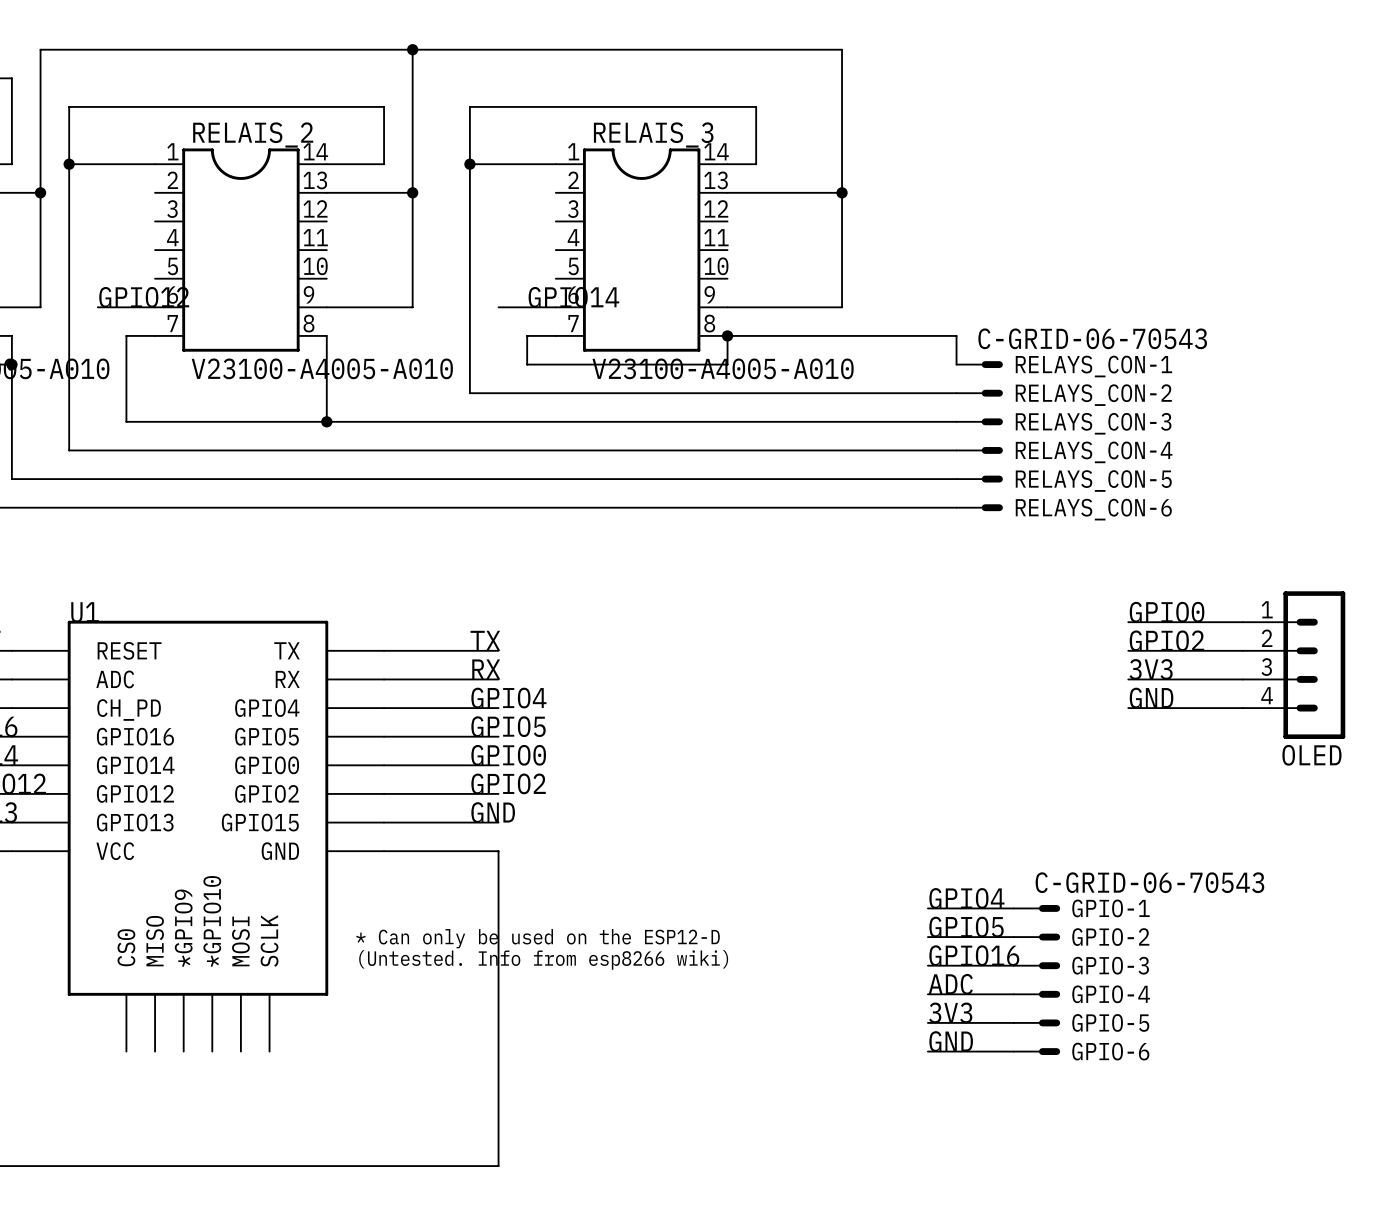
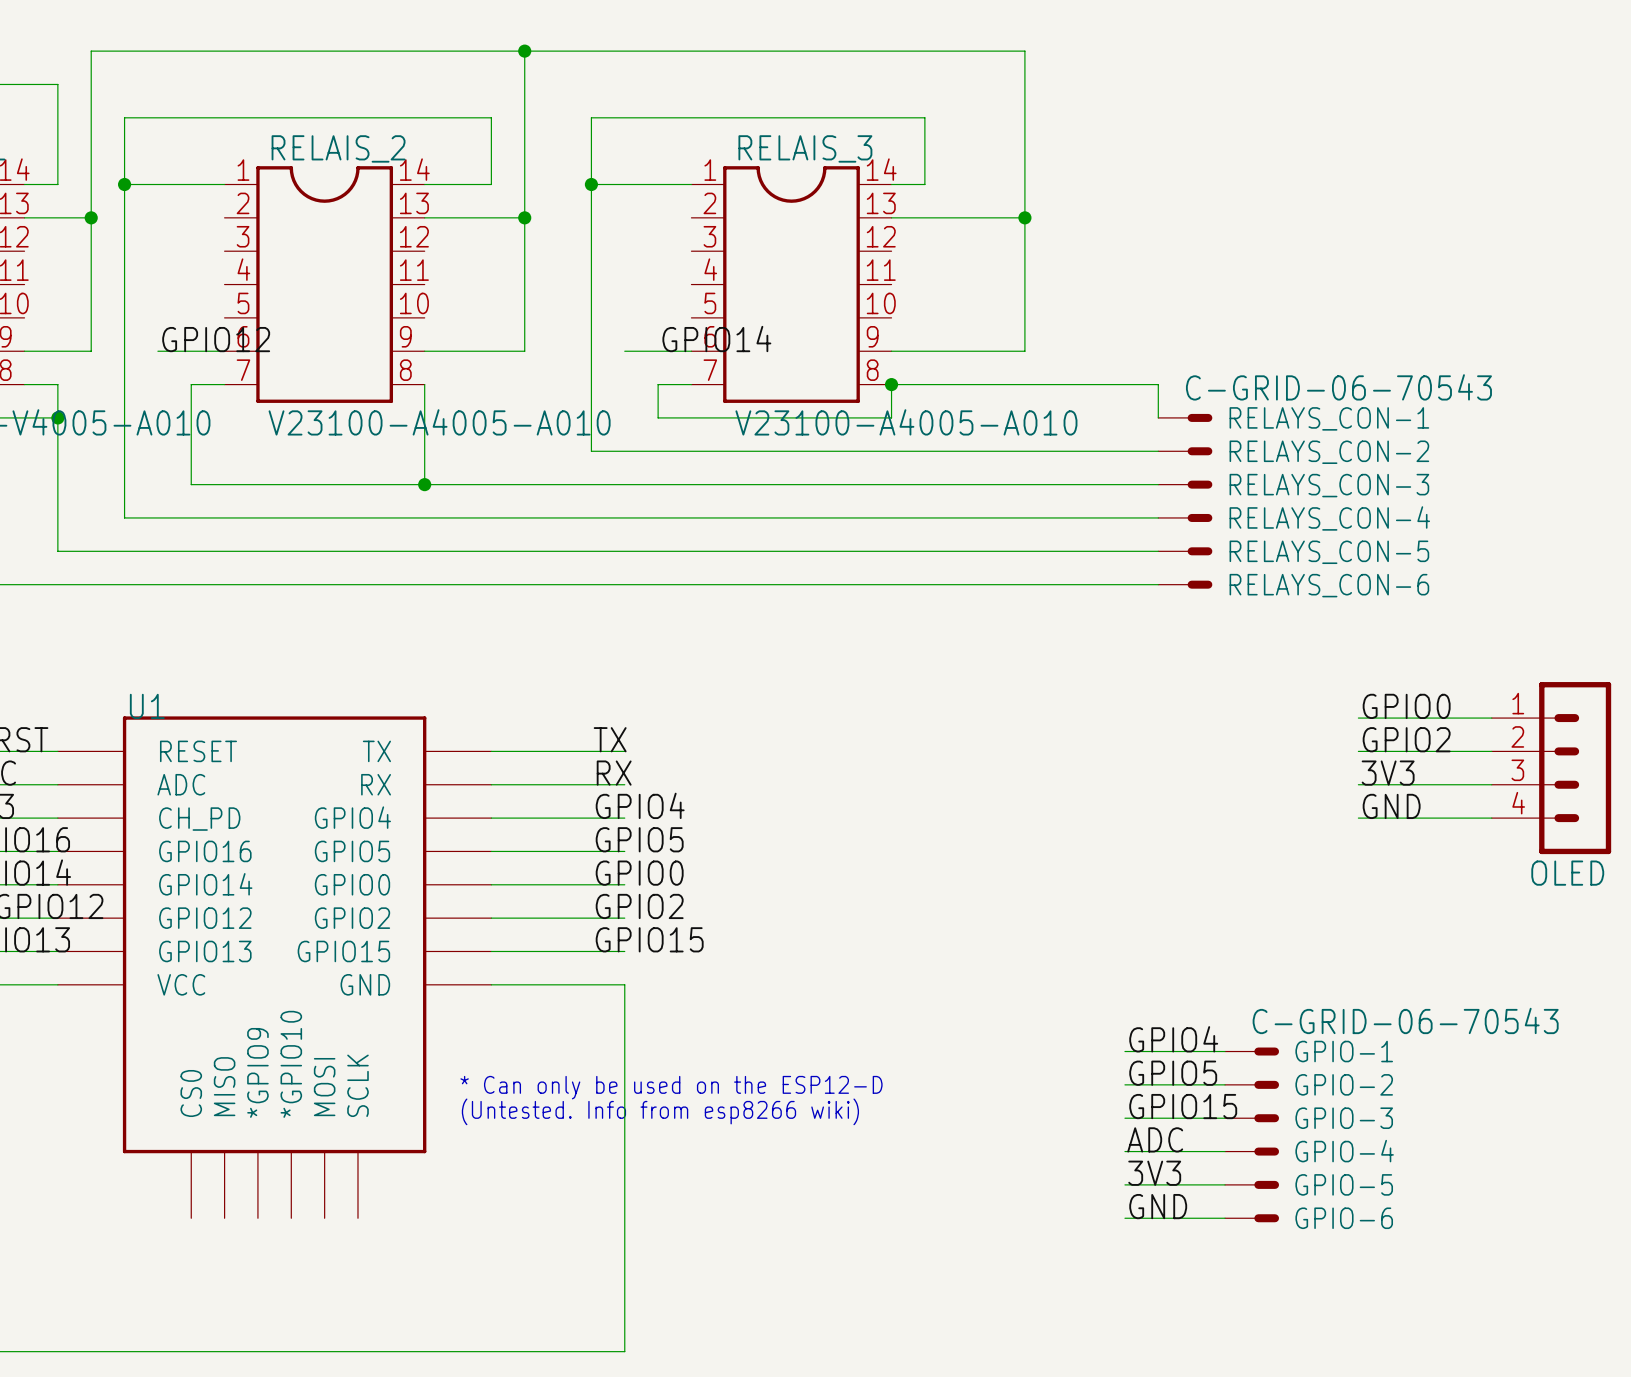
label: GND (493, 812) -> GPIO15 (649, 939)
label: GPIO16 (974, 955) -> GPIO15 (1183, 1106)

